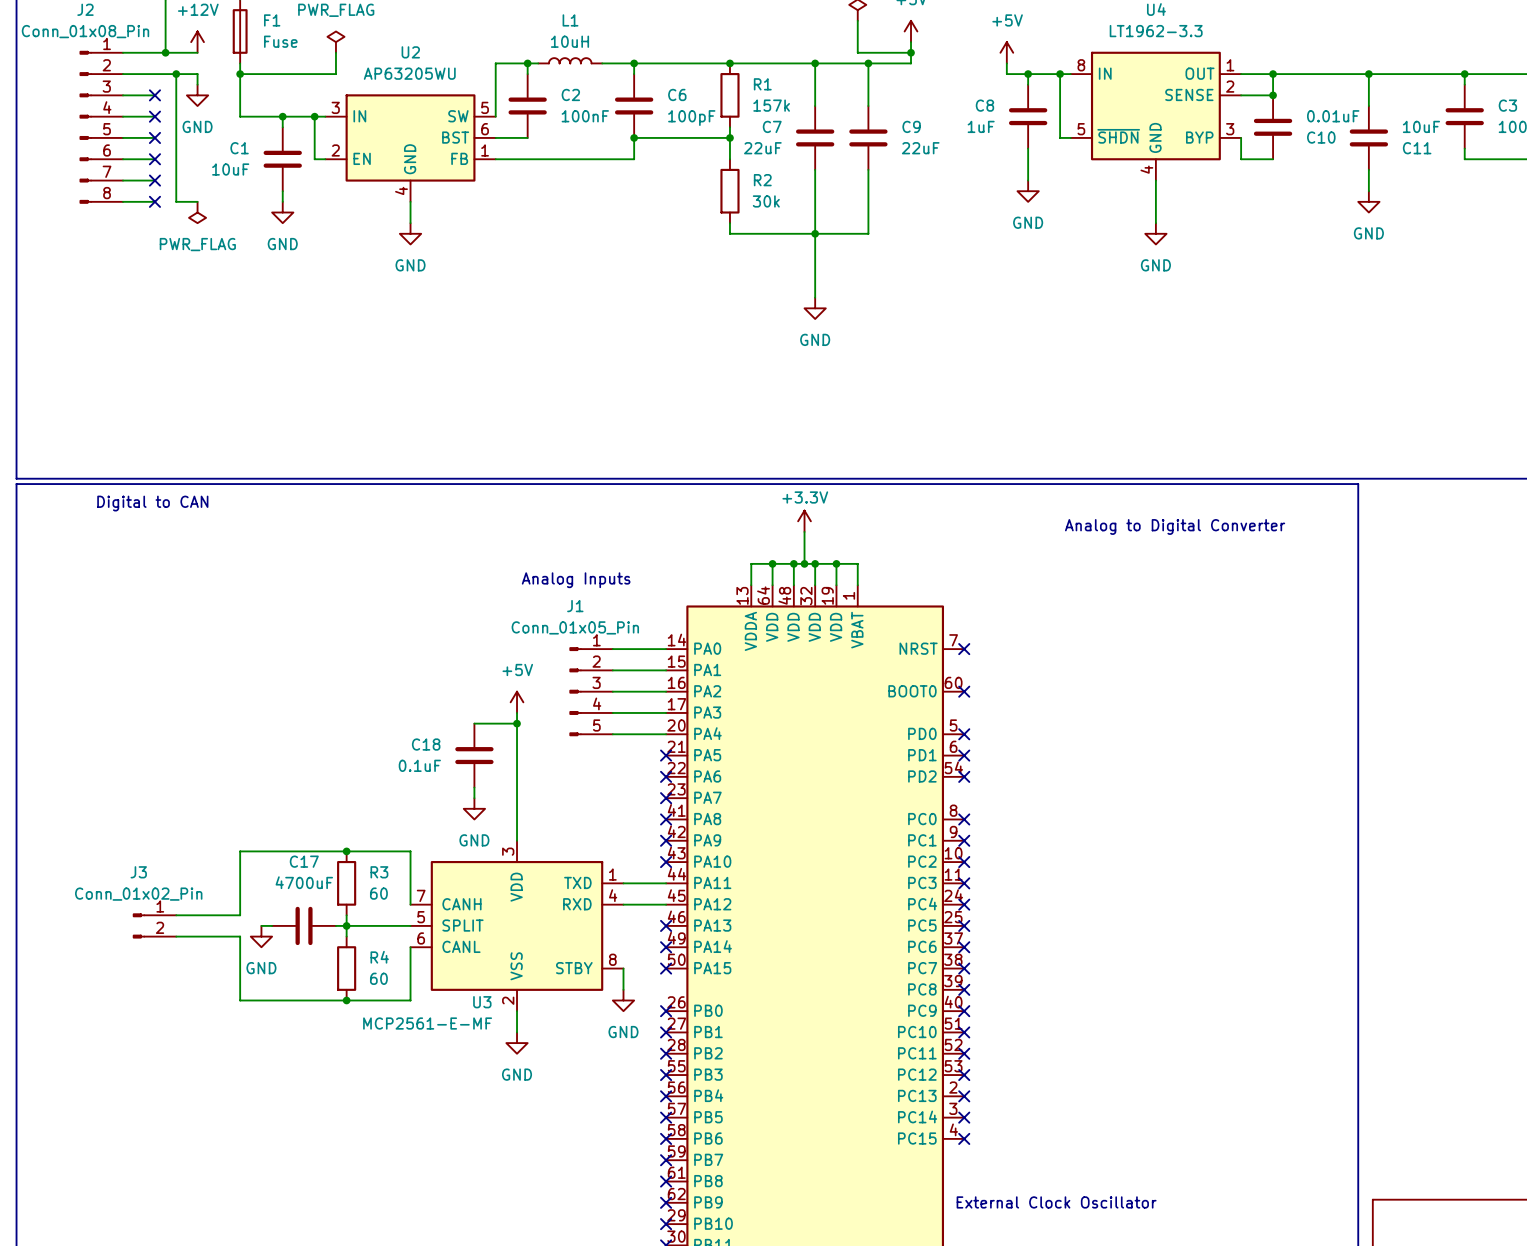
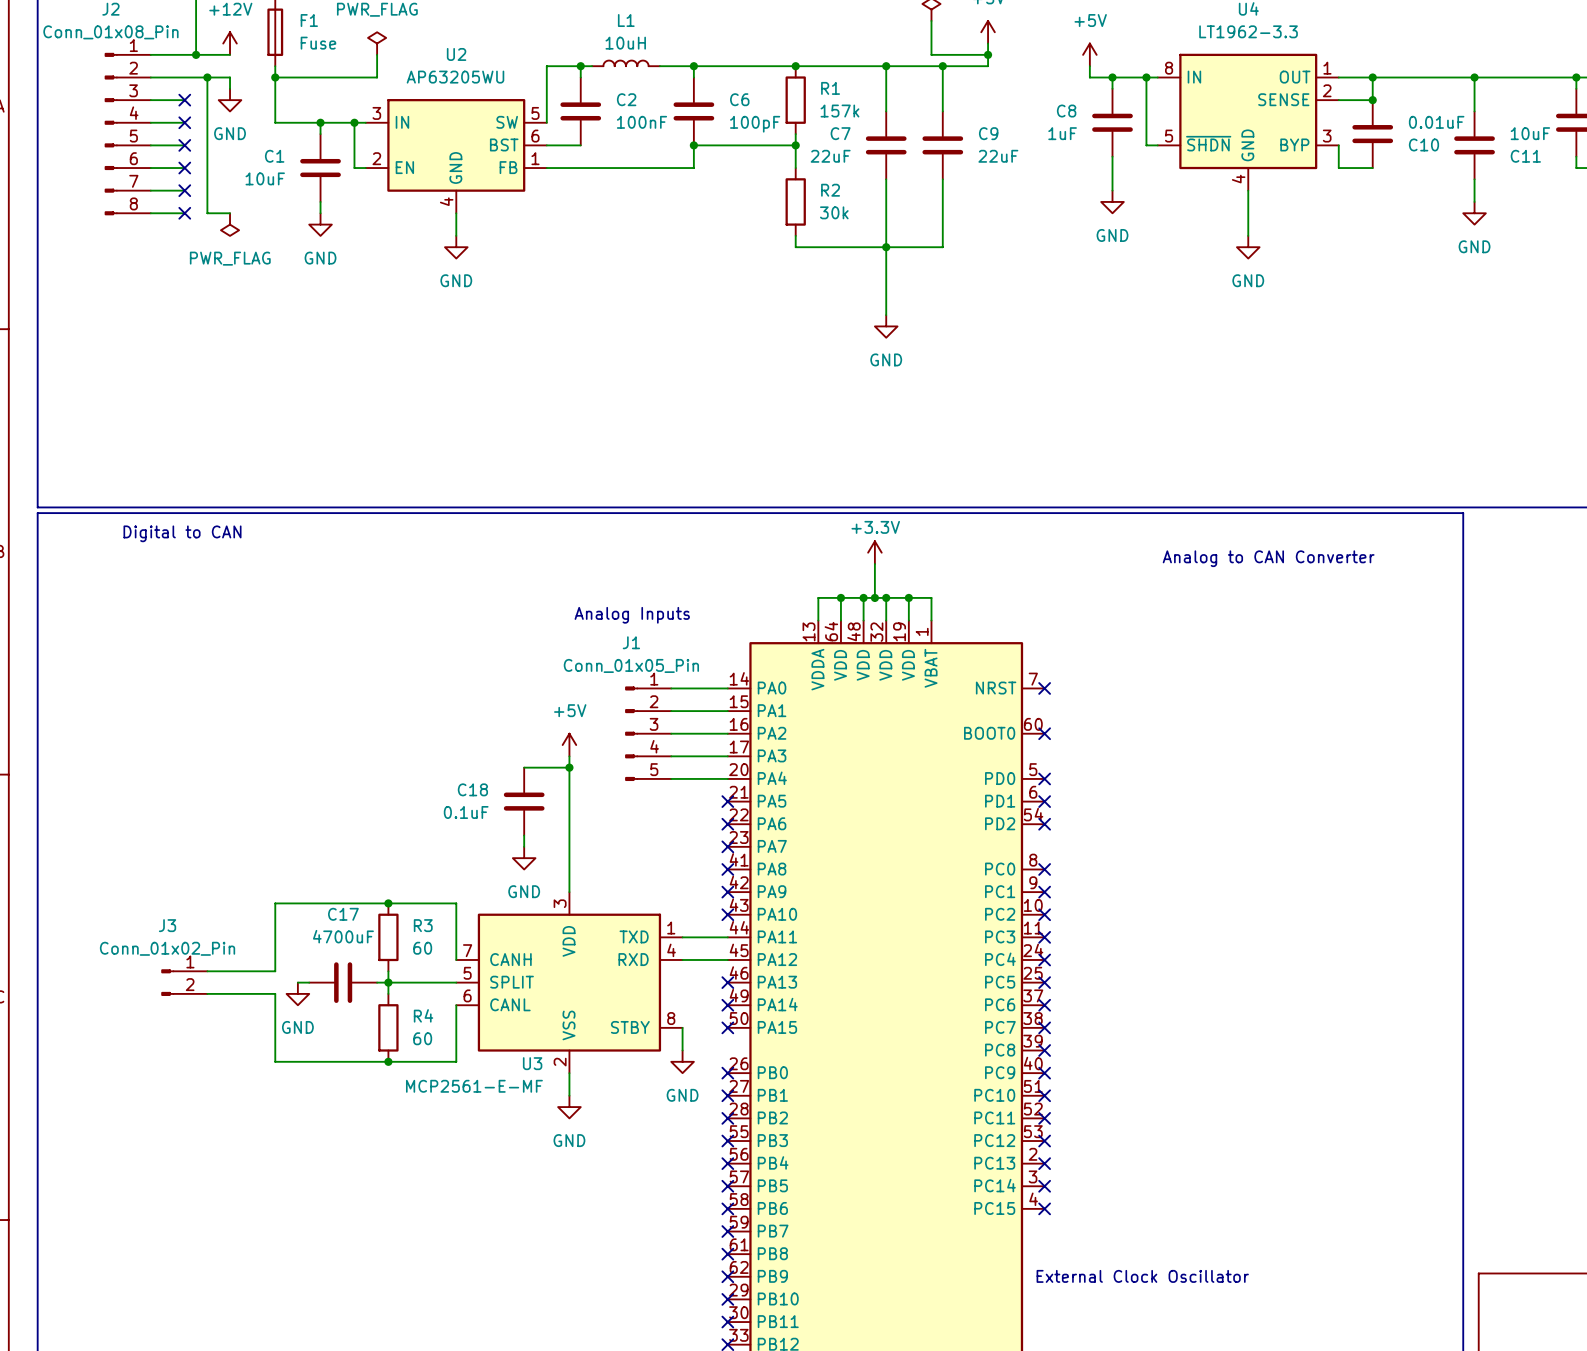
text: Analog to Digital Converter (1175, 526) -> Analog to CAN Converter (1268, 558)

